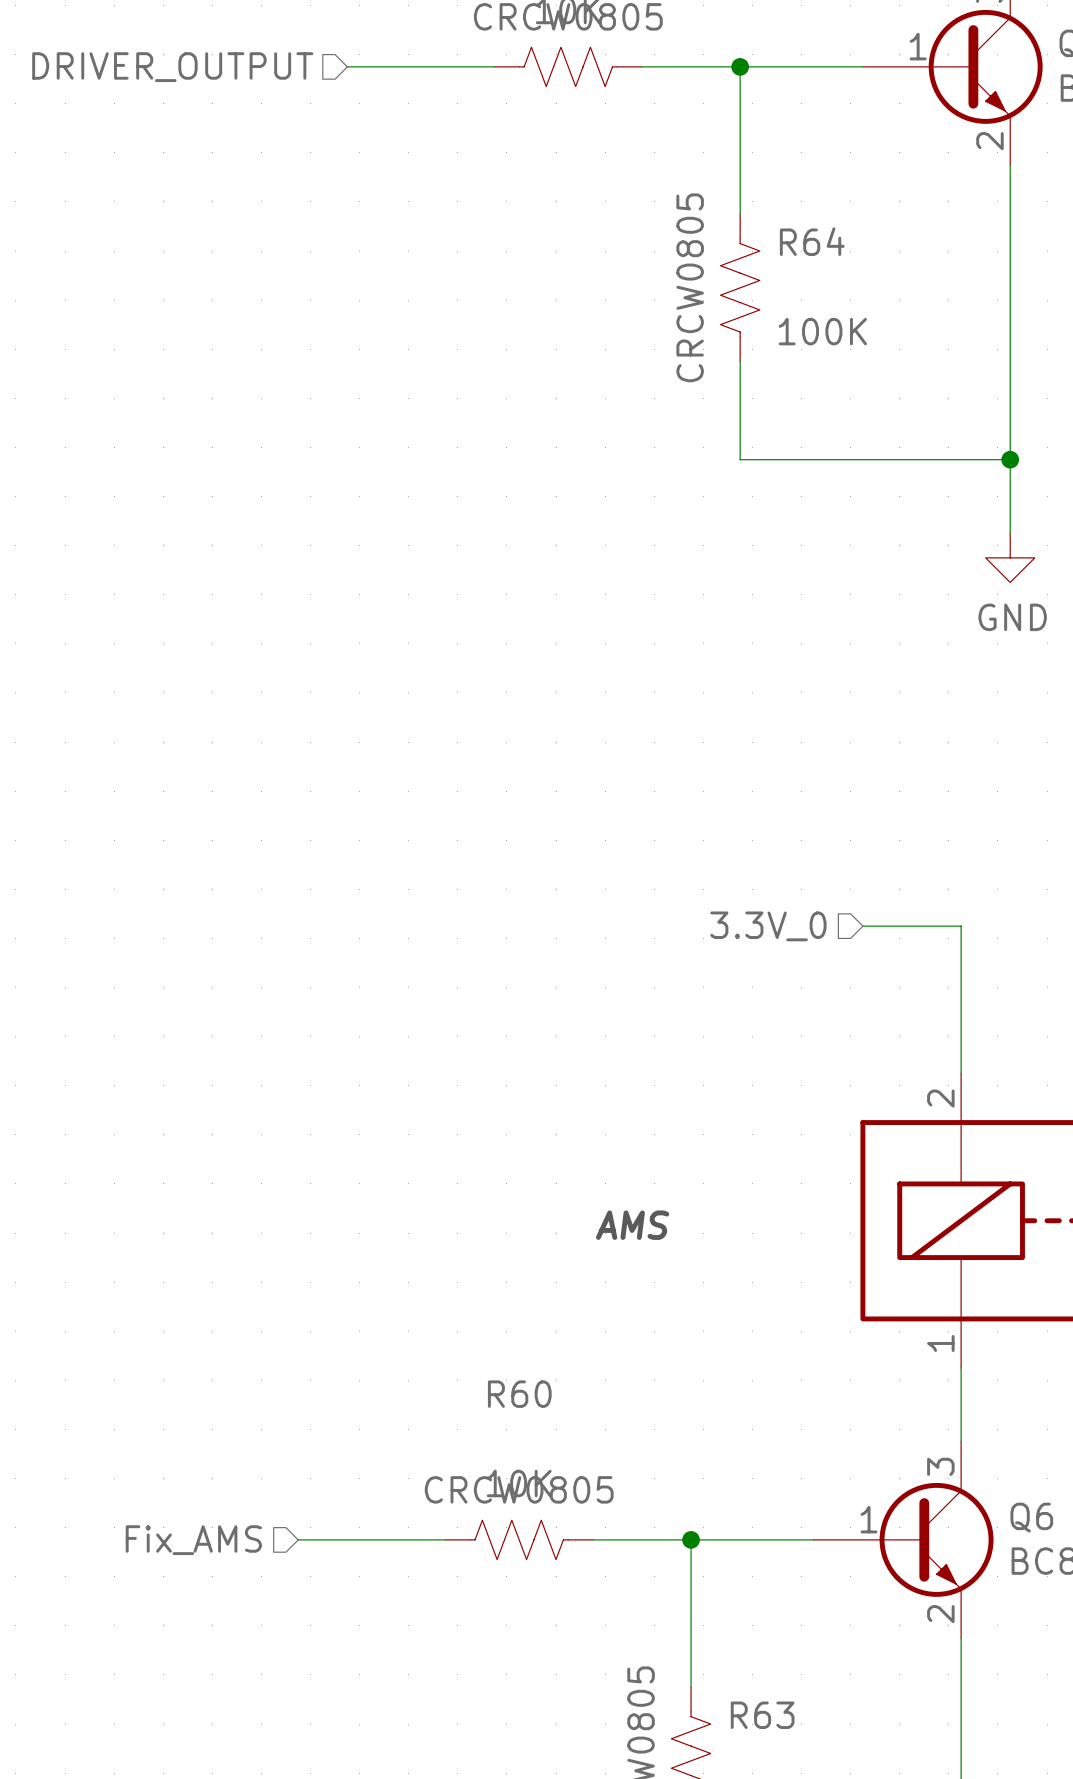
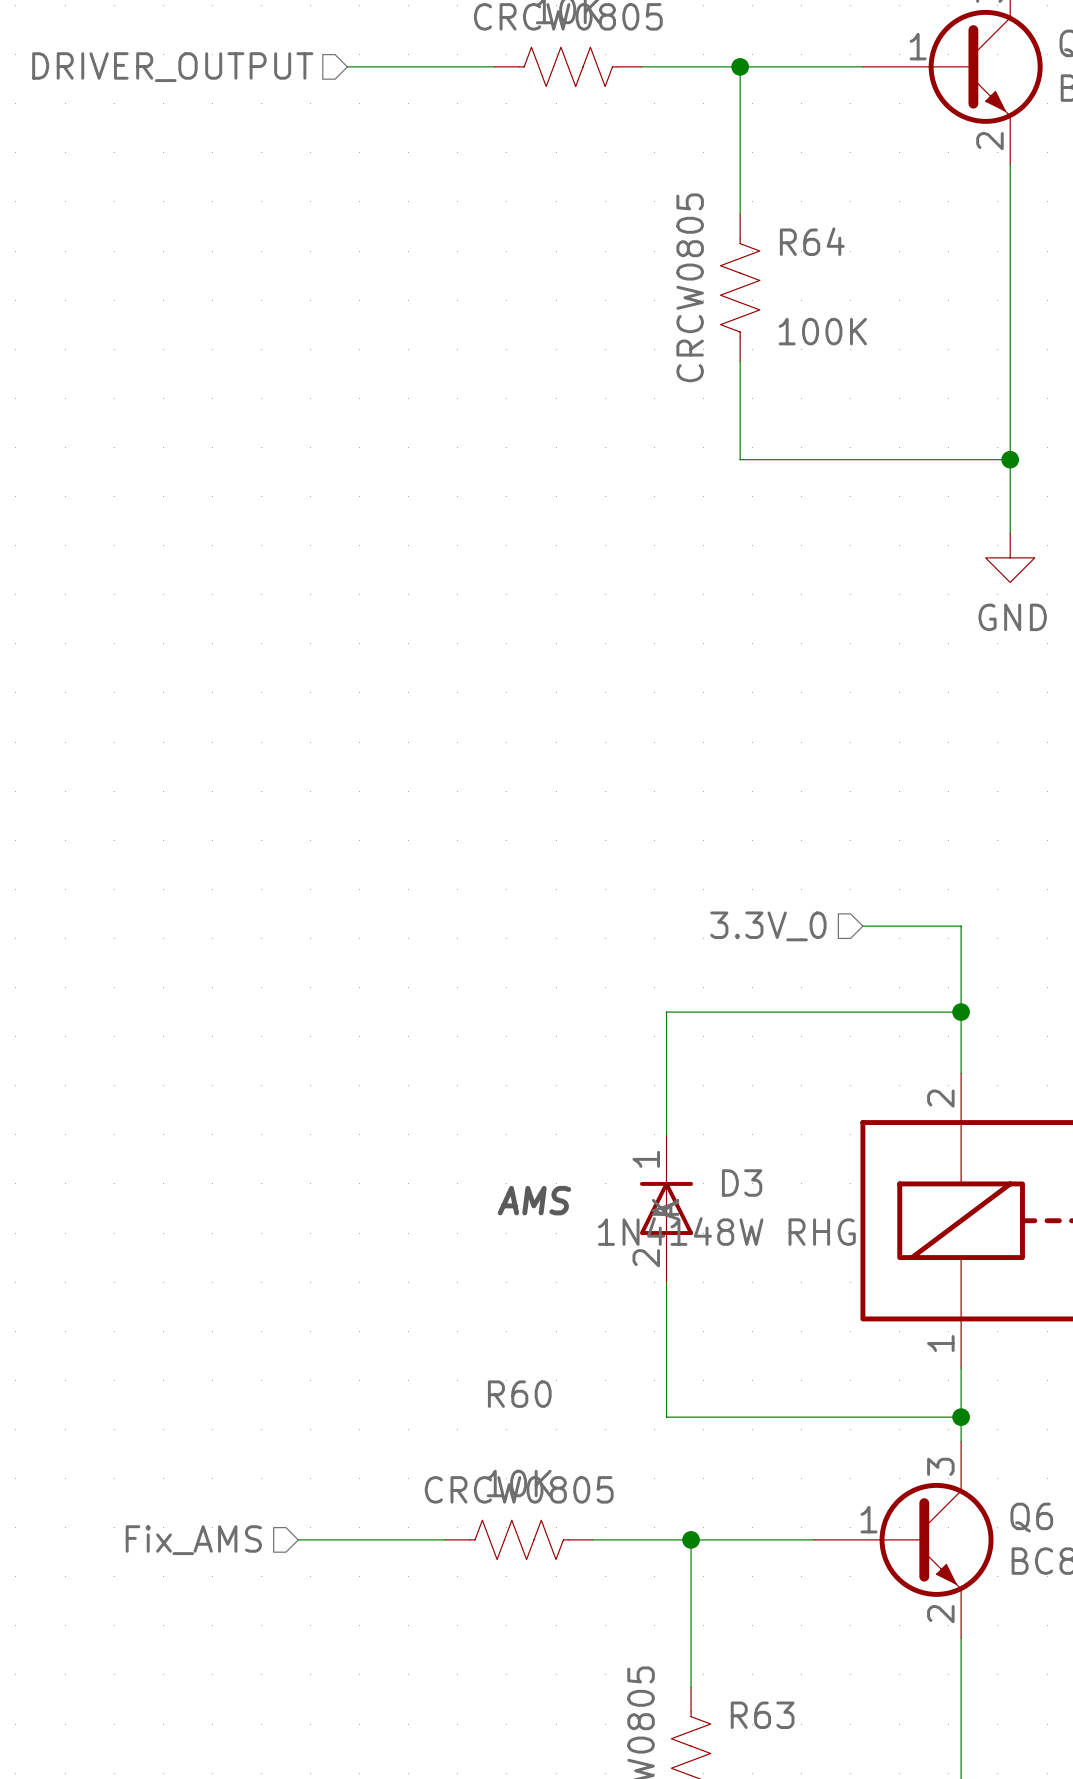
wire: none -> (961, 1012) (666, 1012) (666, 1134)
junction: none -> (961, 1012)
D3: none -> 1N4148W RHG (666, 1208)
text position: AMS (632, 1225) -> AMS (534, 1200)
wire: none -> (666, 1282) (666, 1417) (961, 1417)
junction: none -> (961, 1417)

